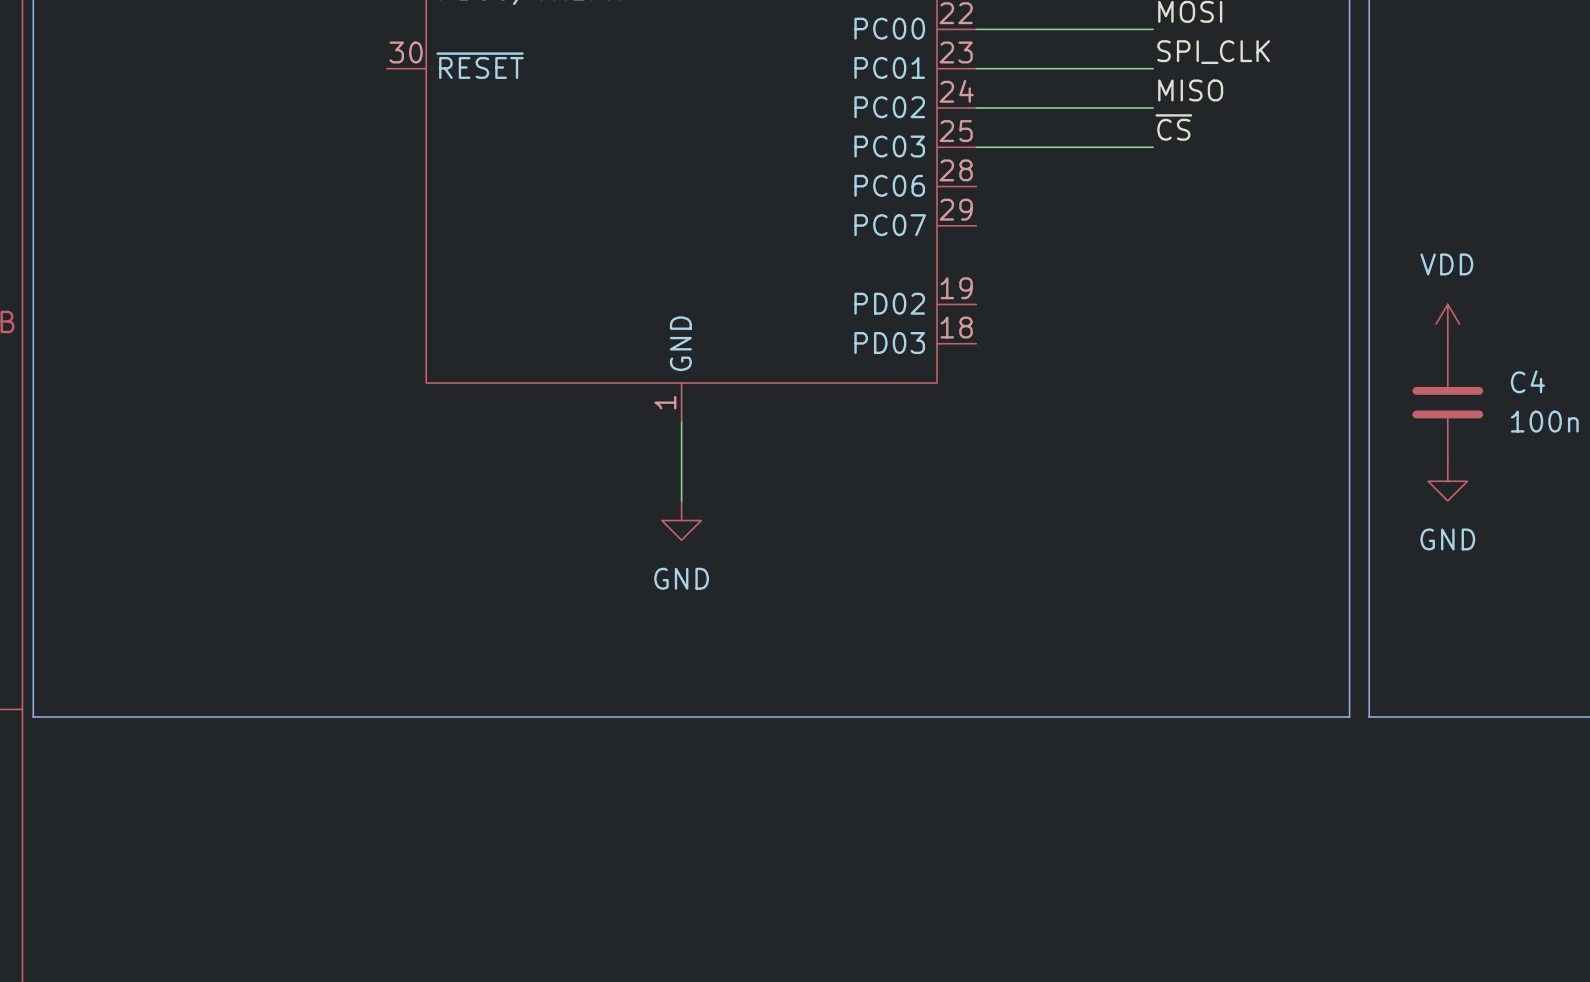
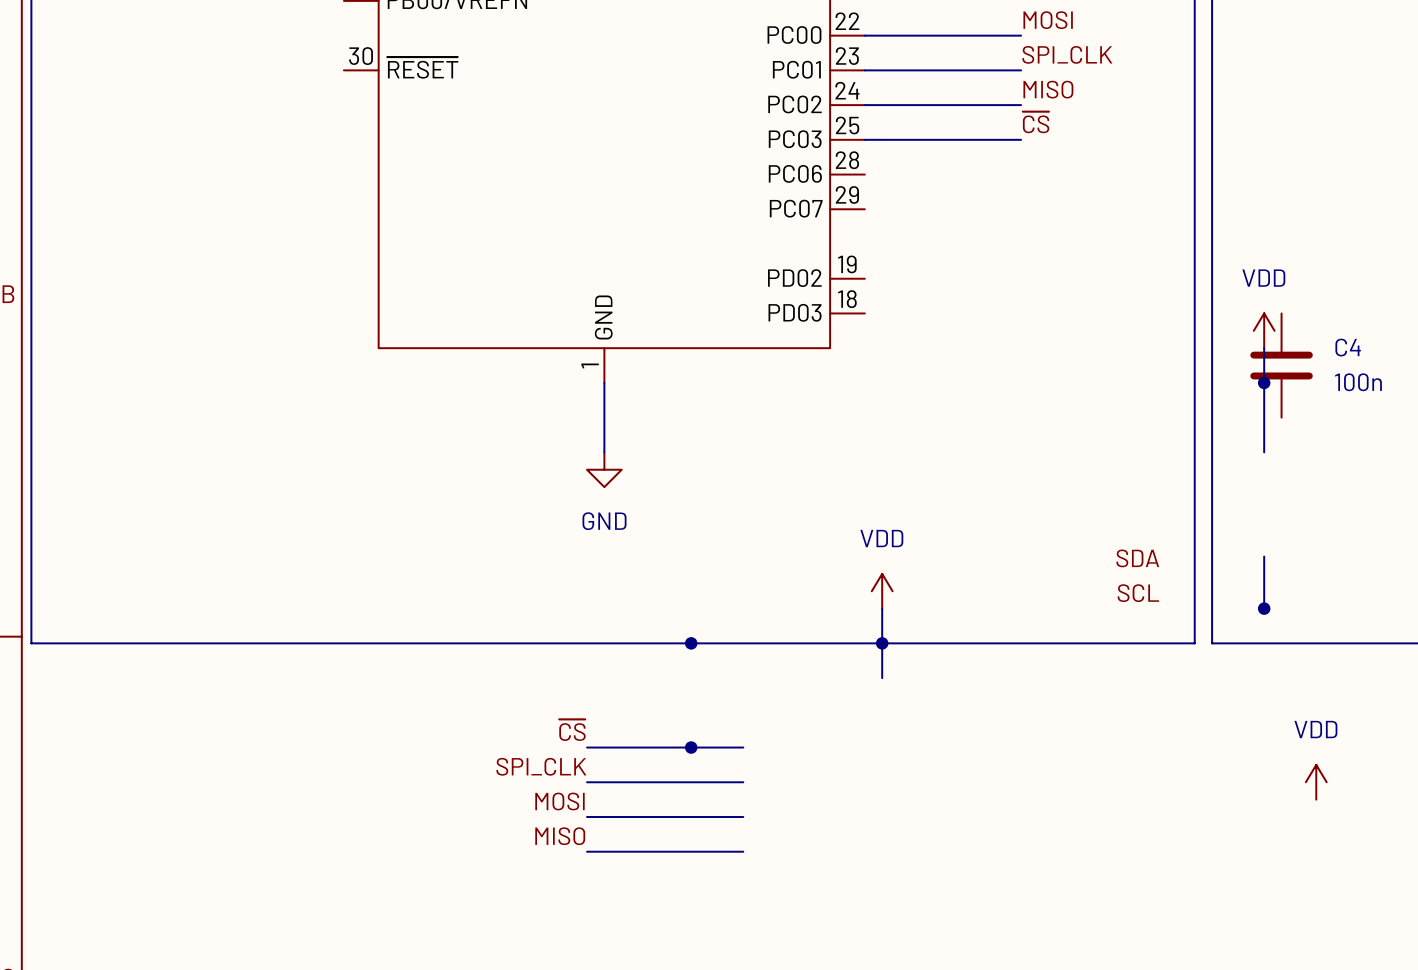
power symbol position: VDD (1447, 324) -> VDD (1264, 330)
wire: none -> (1264, 348) (1264, 452)
junction: none -> (1264, 382)
power symbol: GND (1447, 481) -> none
wire: none -> (1264, 556) (1264, 608)
label: none -> SDA (1137, 558)
power symbol: none -> VDD (882, 591)
label: none -> SCL (1138, 593)
wire: none -> (882, 608) (882, 678)
junction: none -> (1264, 608)
junction: none -> (691, 643)
junction: none -> (882, 643)
label: none -> ~{CS} (572, 730)
wire: none -> (587, 747) (743, 747)
junction: none -> (691, 747)
label: none -> SPI_CLK (541, 766)
wire: none -> (587, 782) (743, 782)
power symbol: none -> VDD (1316, 782)
label: none -> MOSI (559, 801)
wire: none -> (587, 816) (743, 816)
label: none -> MISO (560, 836)
wire: none -> (587, 851) (743, 851)

